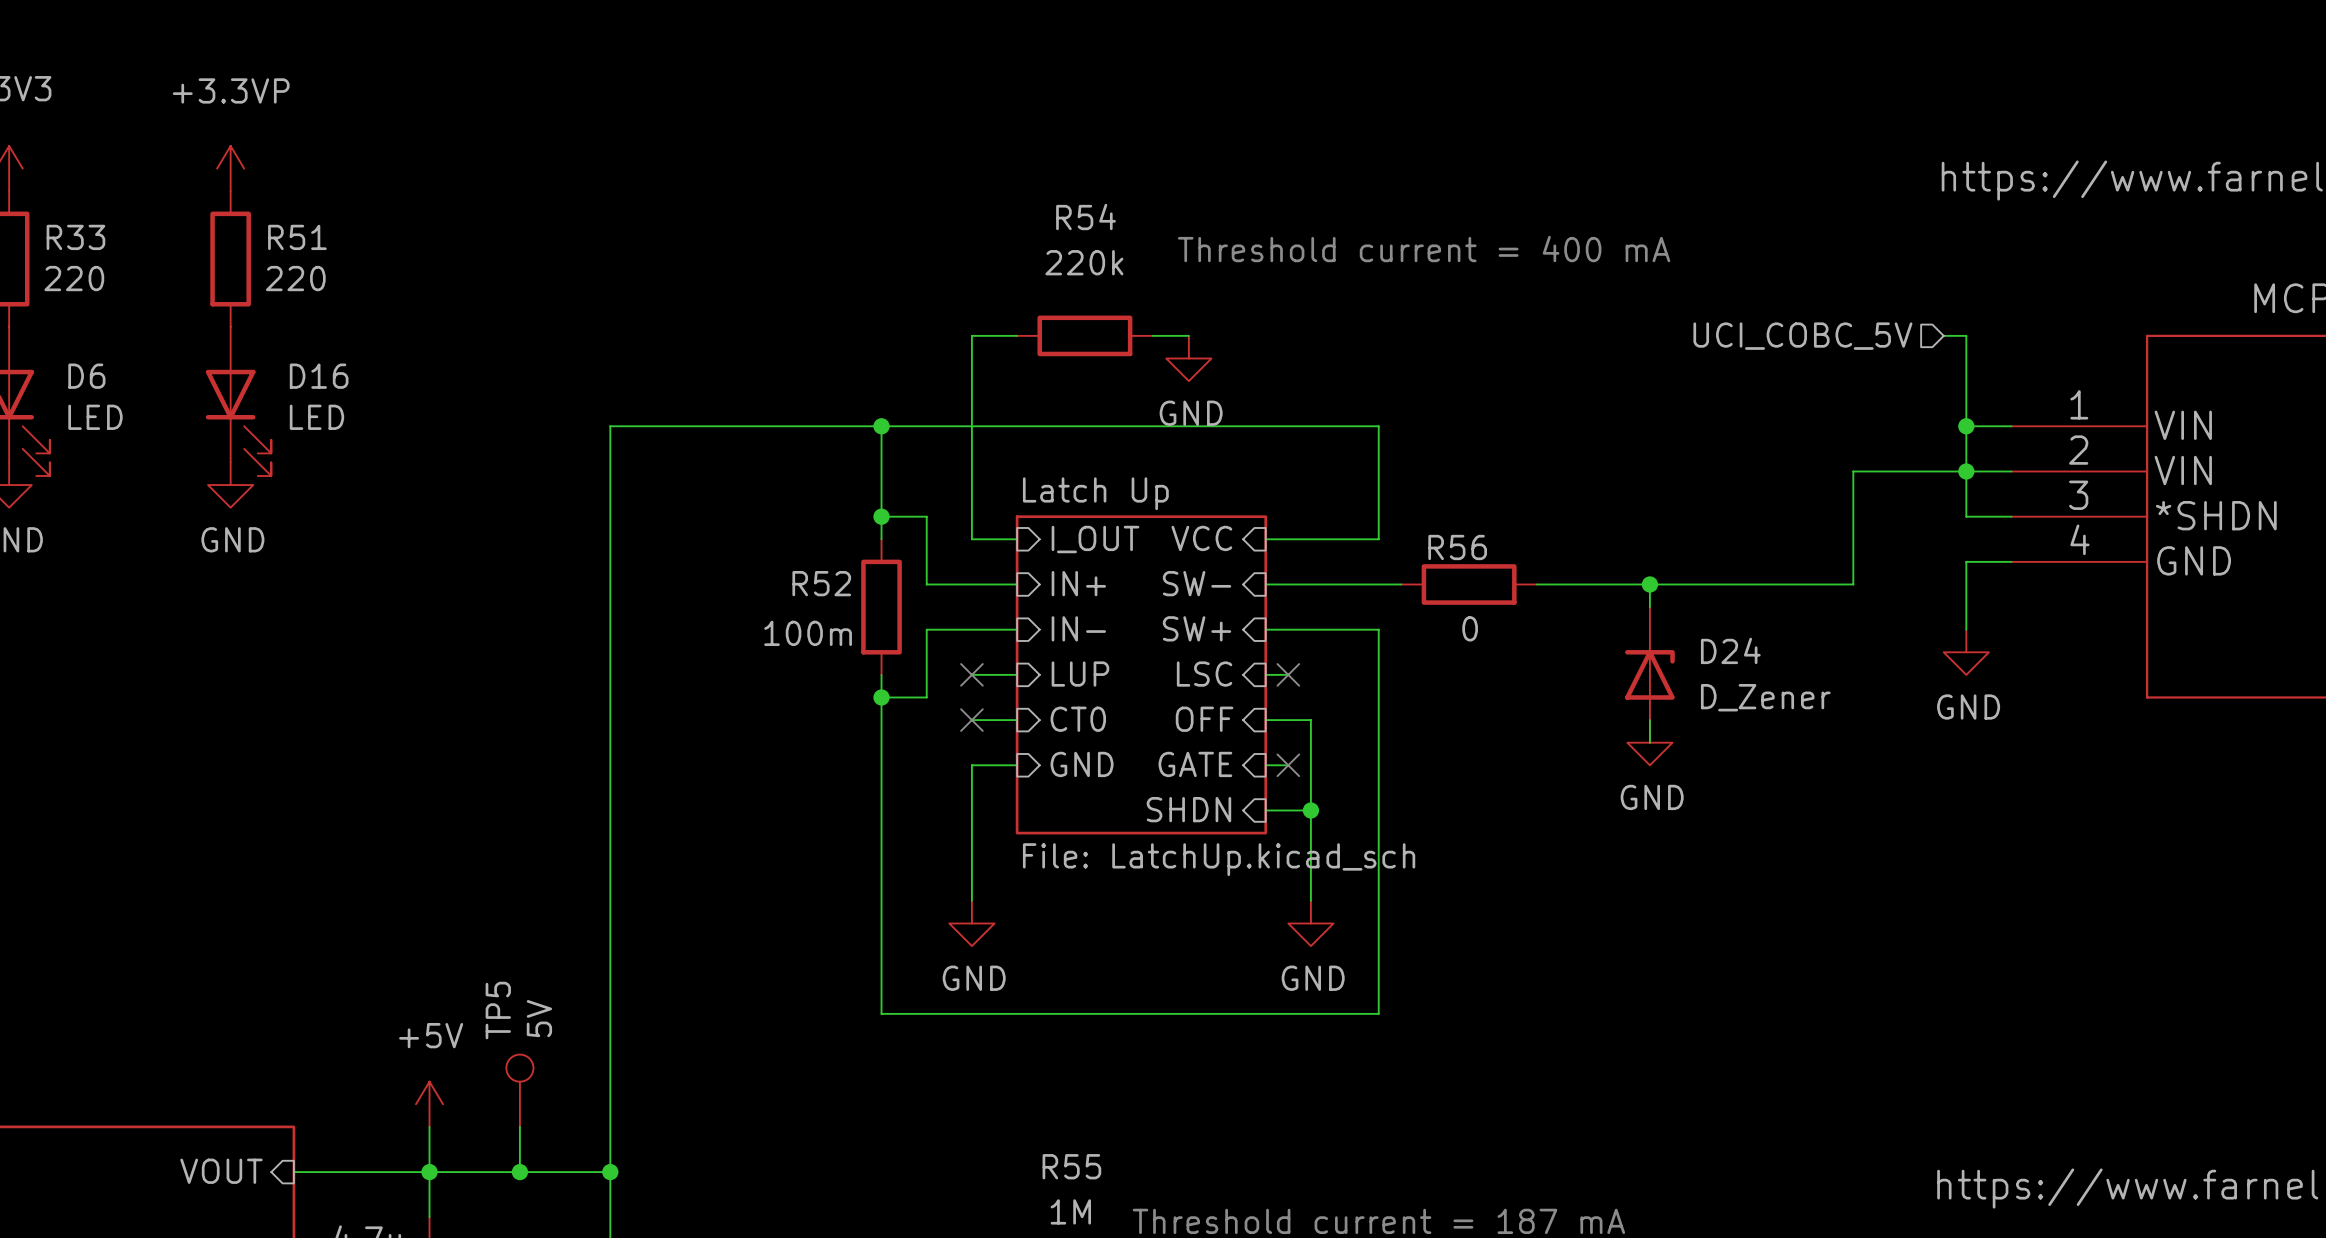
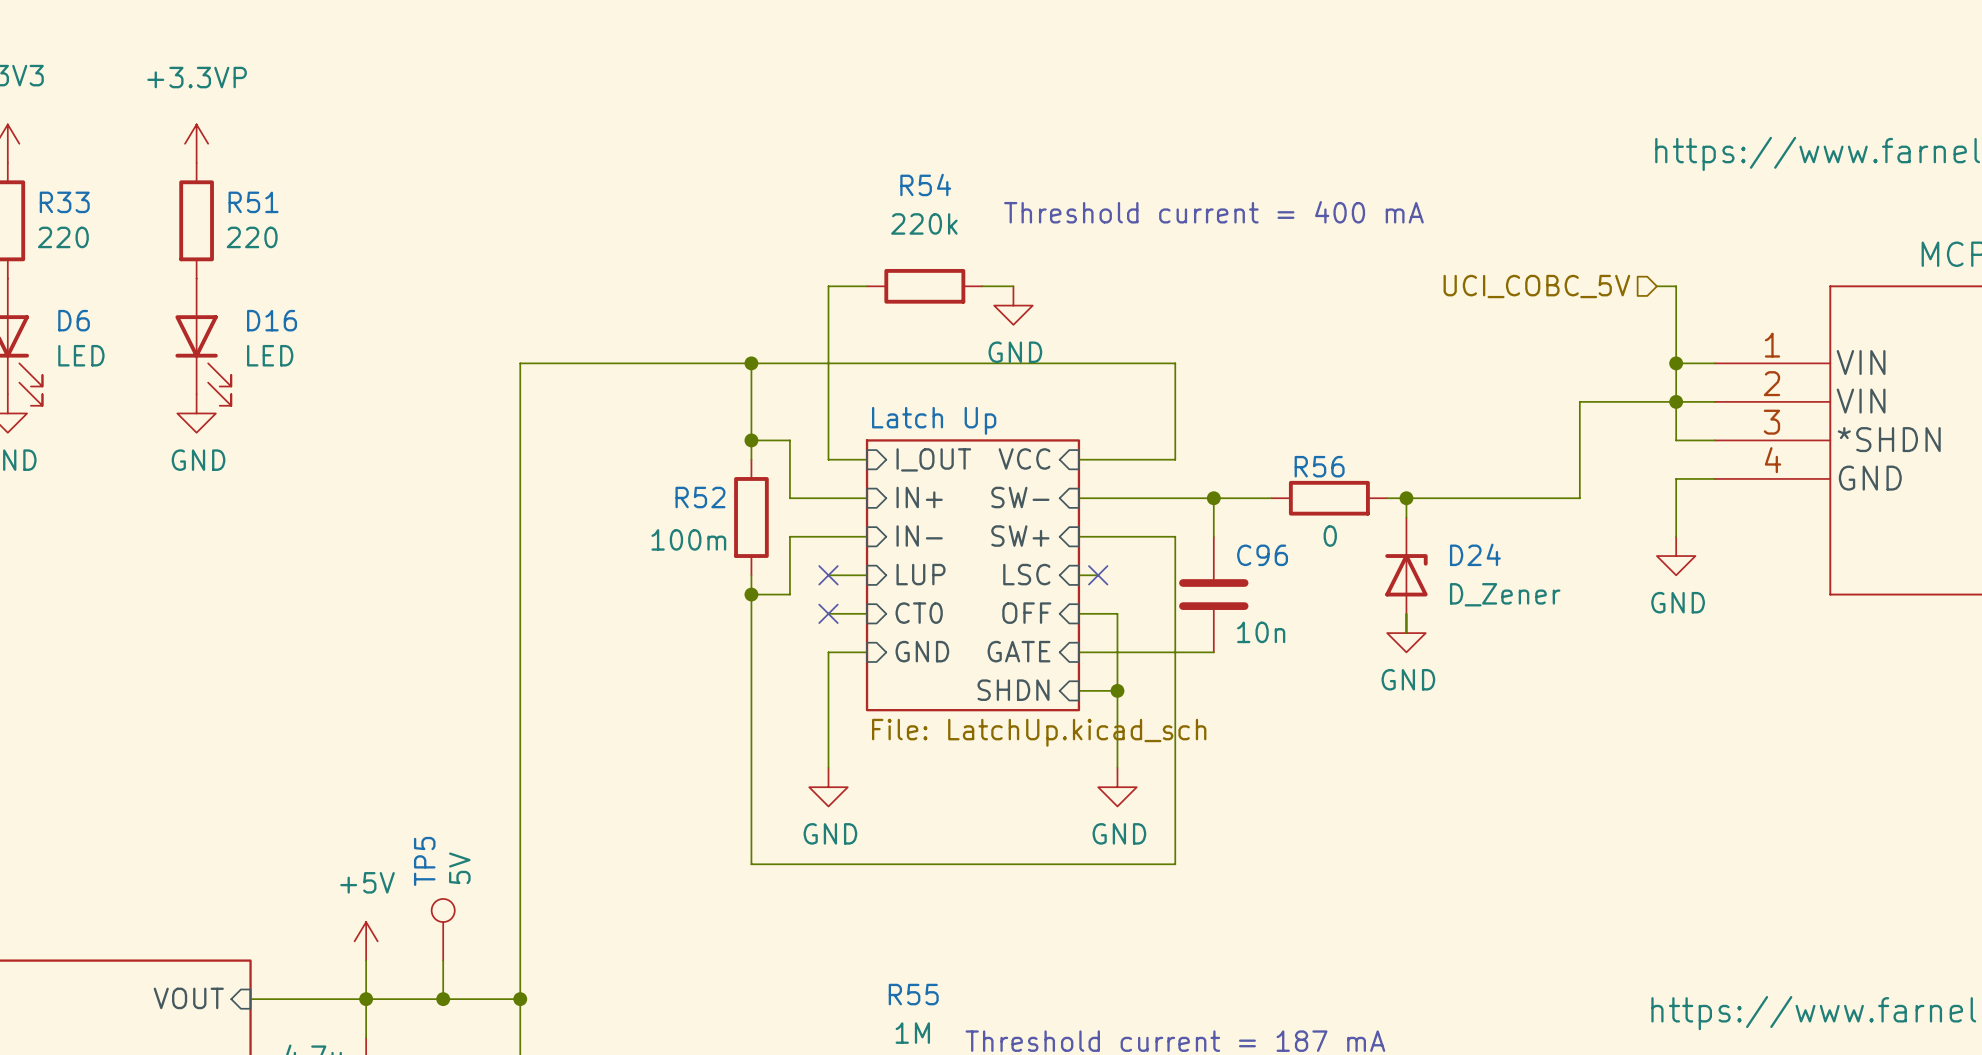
wire: none -> (1213, 498) (1213, 536)
junction: none -> (1213, 498)
R56 position: (1469, 584) -> (1329, 498)
wire: (1536, 584) (1627, 584) -> (1194, 498) (1271, 498)
C96: none -> 10n (1213, 594)
wire: none -> (1098, 652) (1213, 652)
no-connect mark: (1288, 765) -> none

